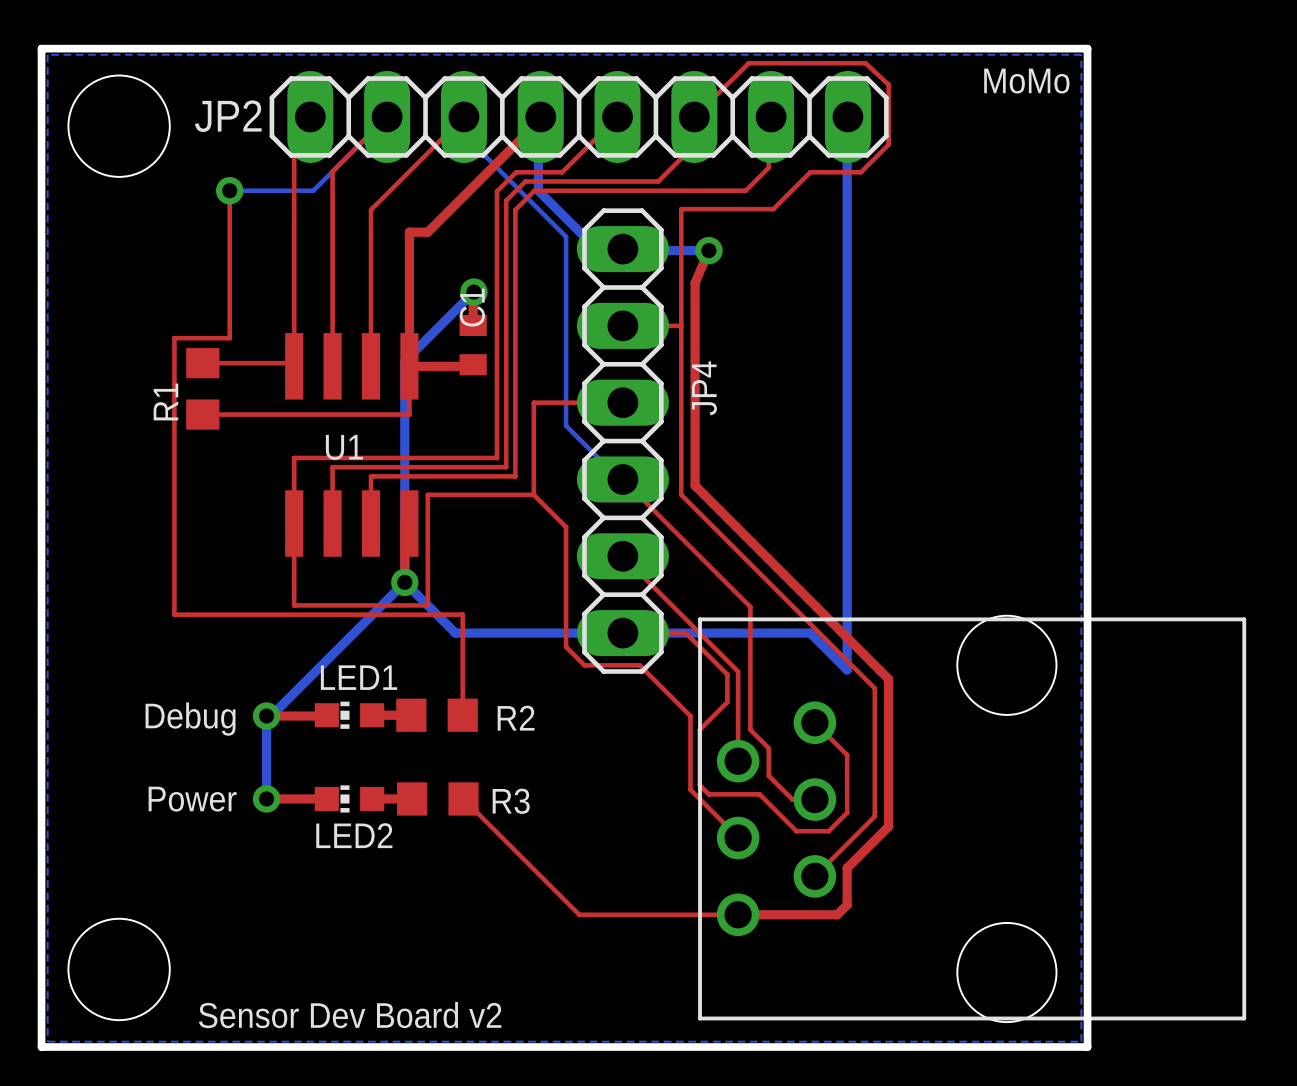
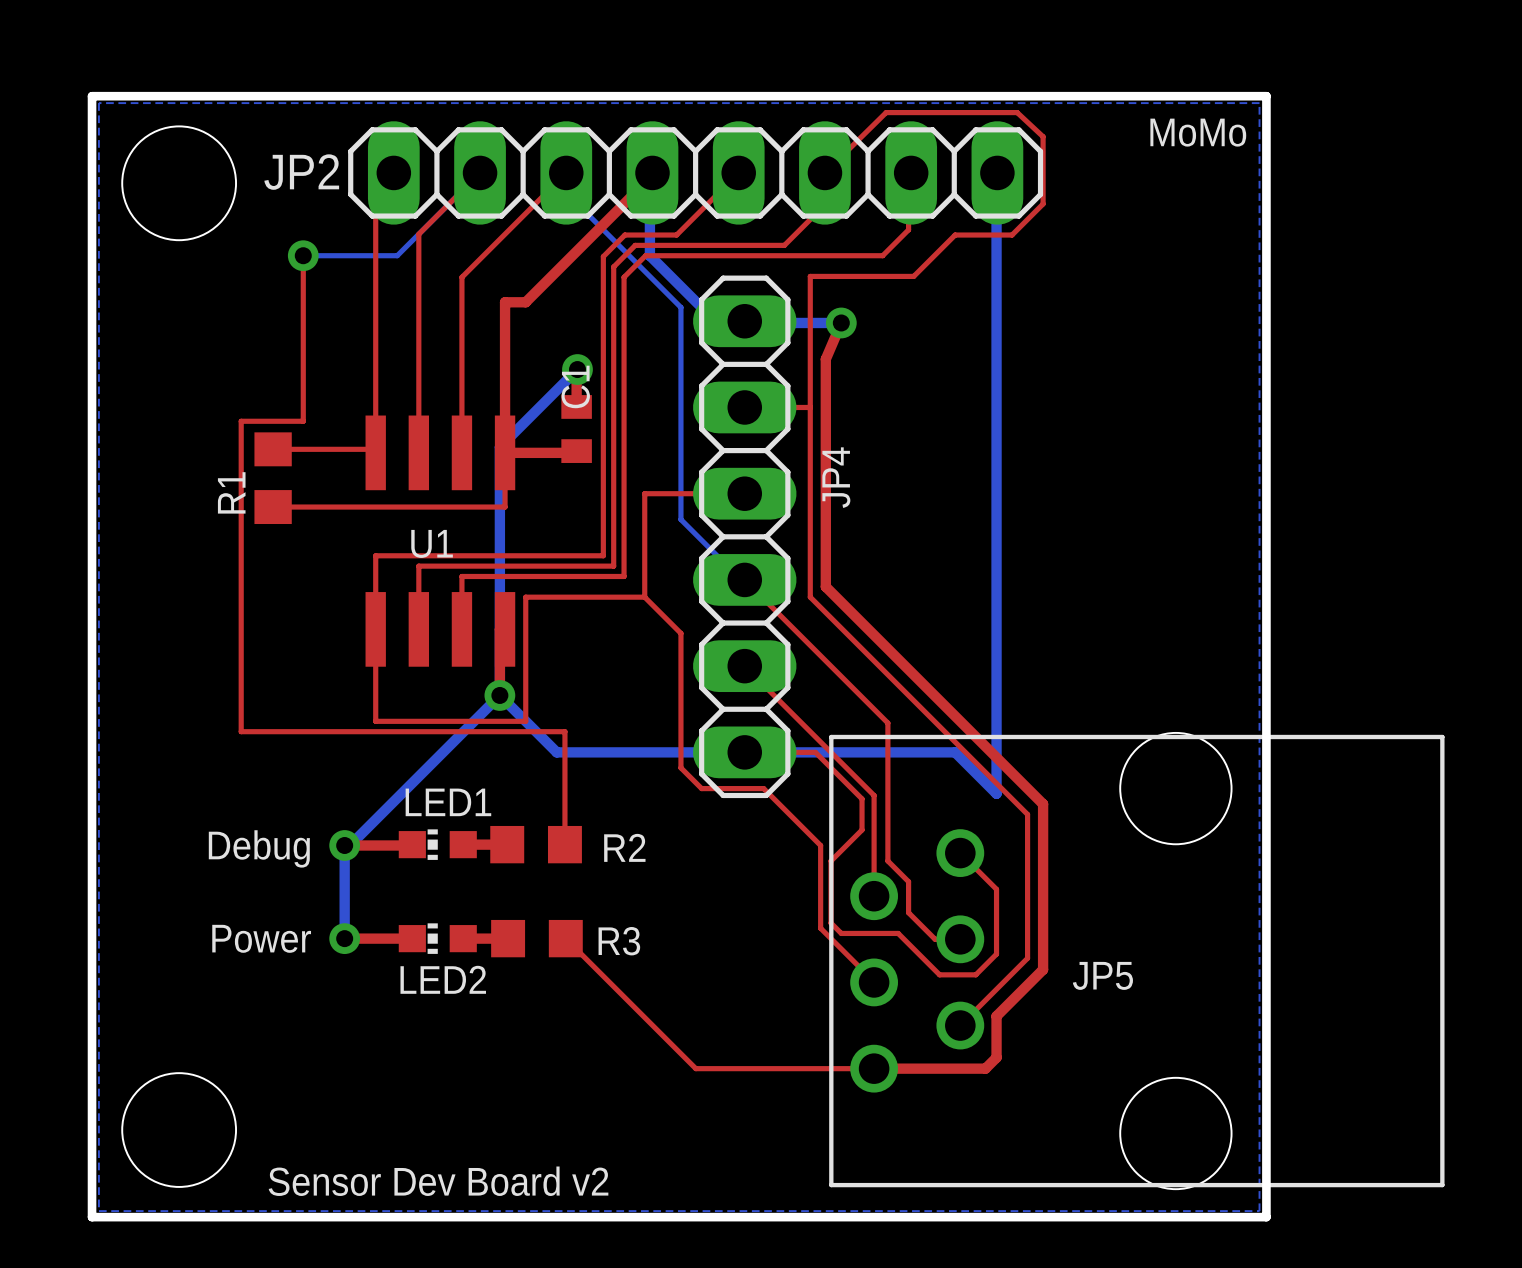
JP5 name: none -> JP5 (1102, 975)

